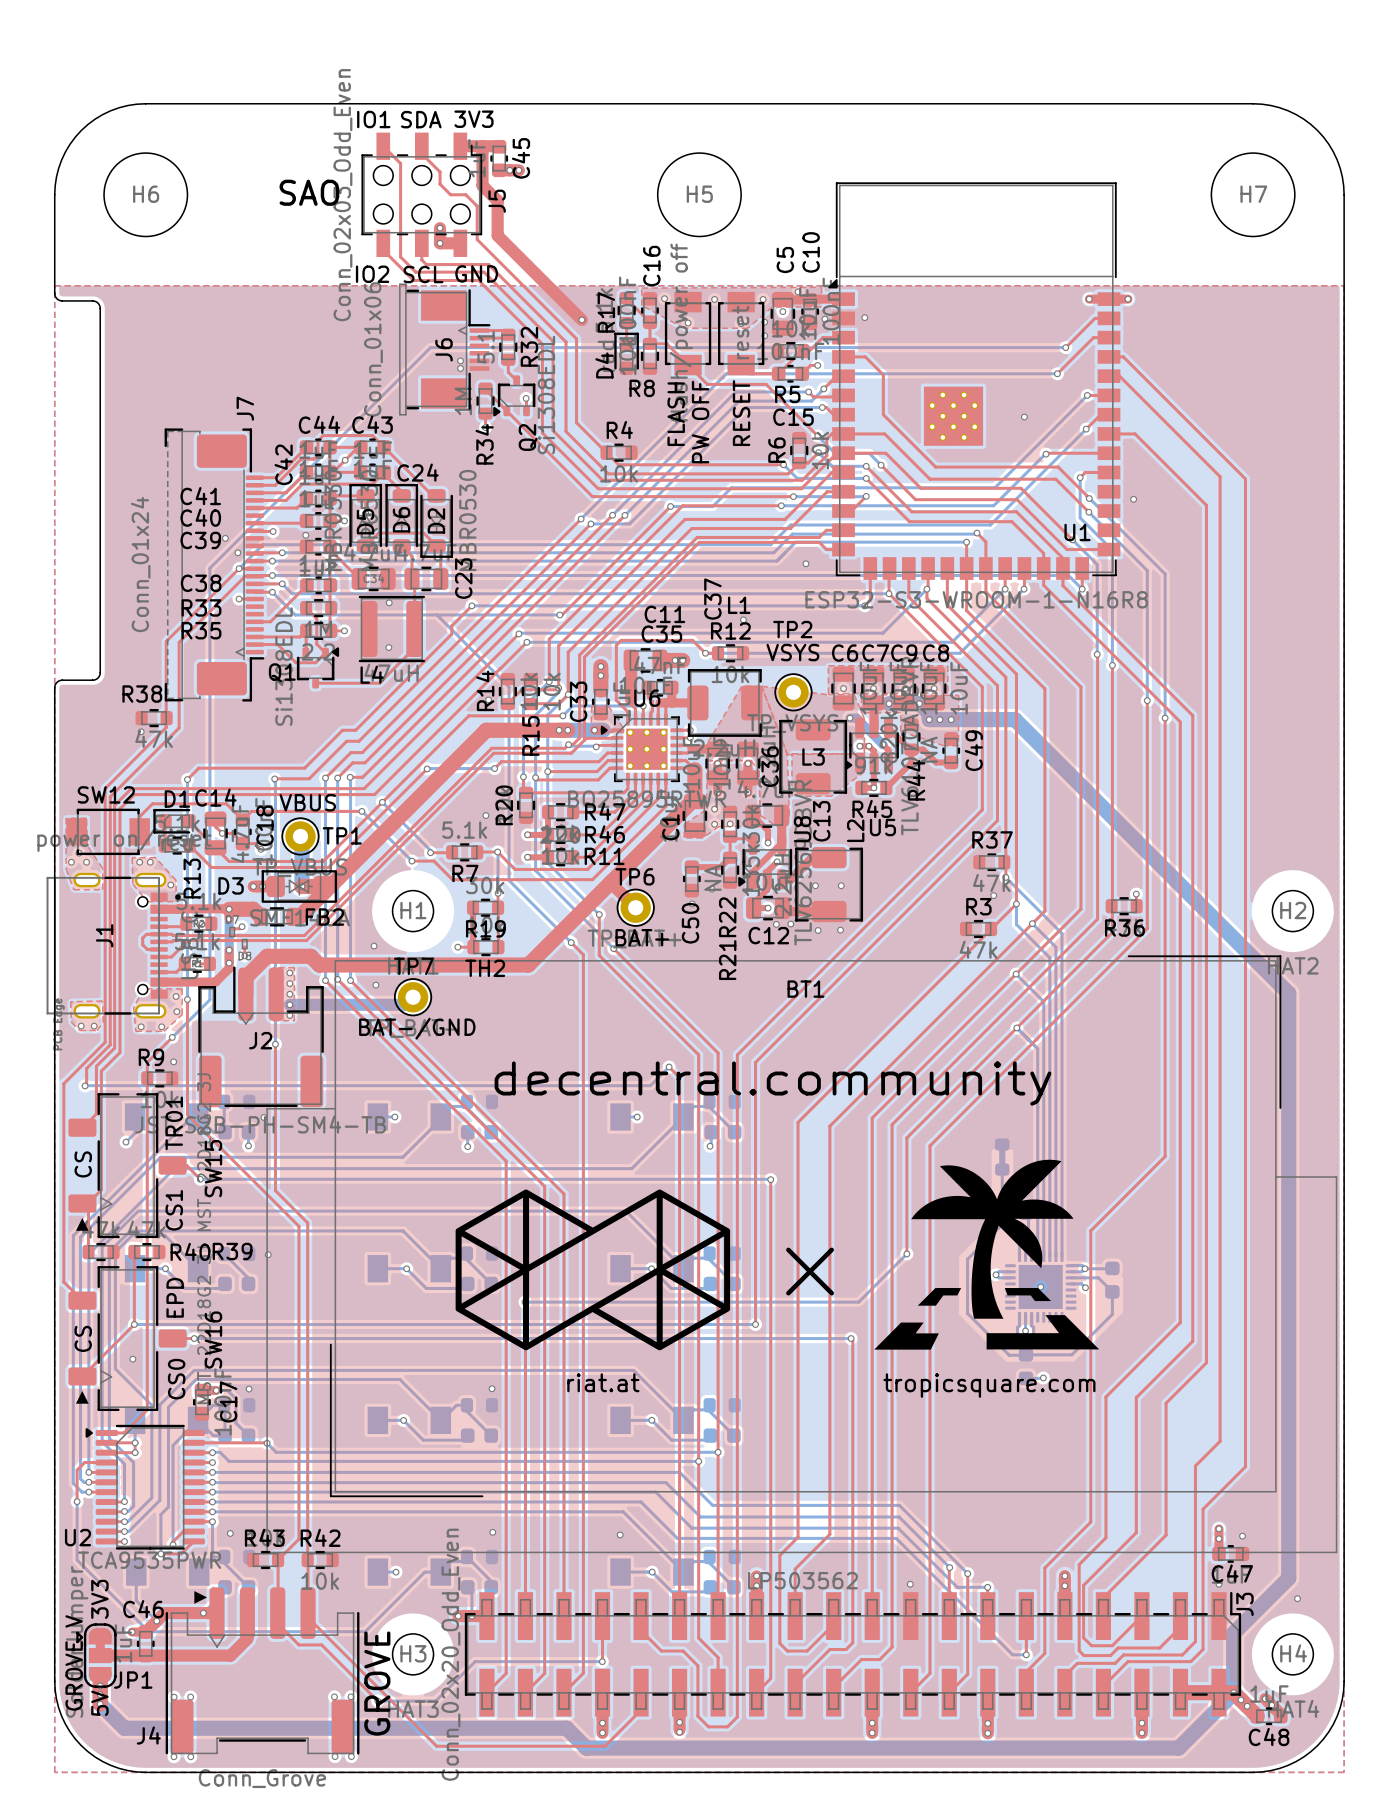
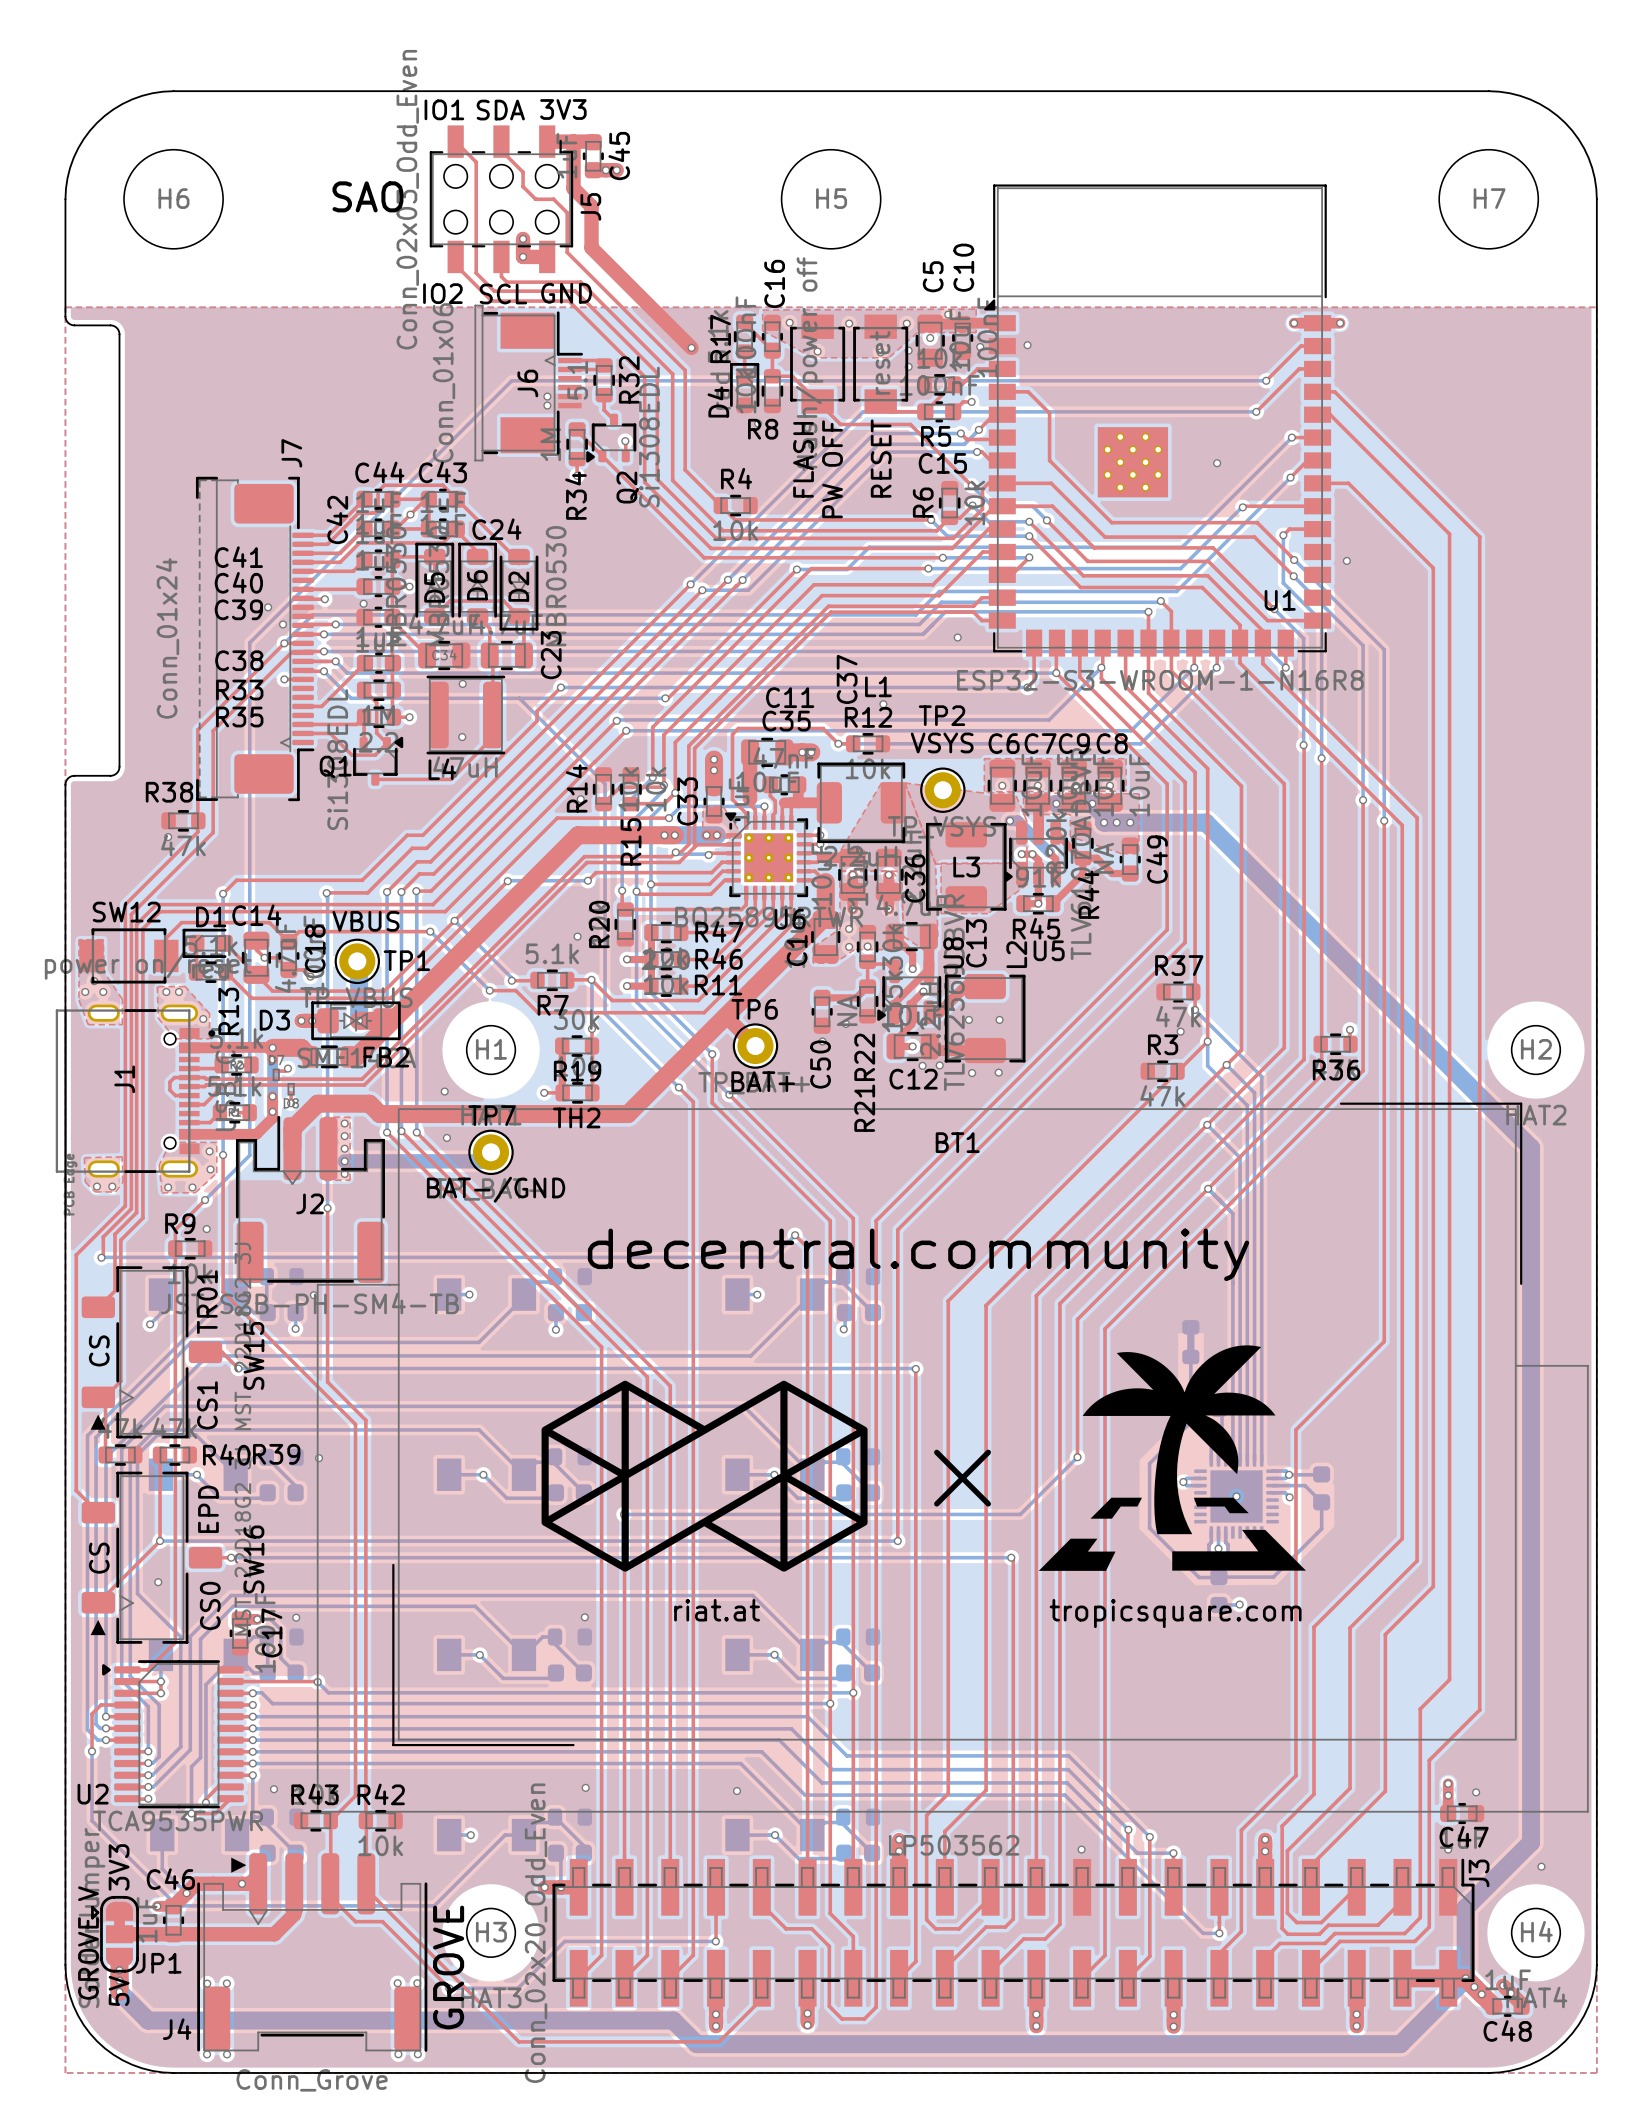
U6 name position: U6 (647, 698) -> U6 (790, 919)
U6 footprint: [600, 713, 683, 786] -> [725, 812, 812, 901]

